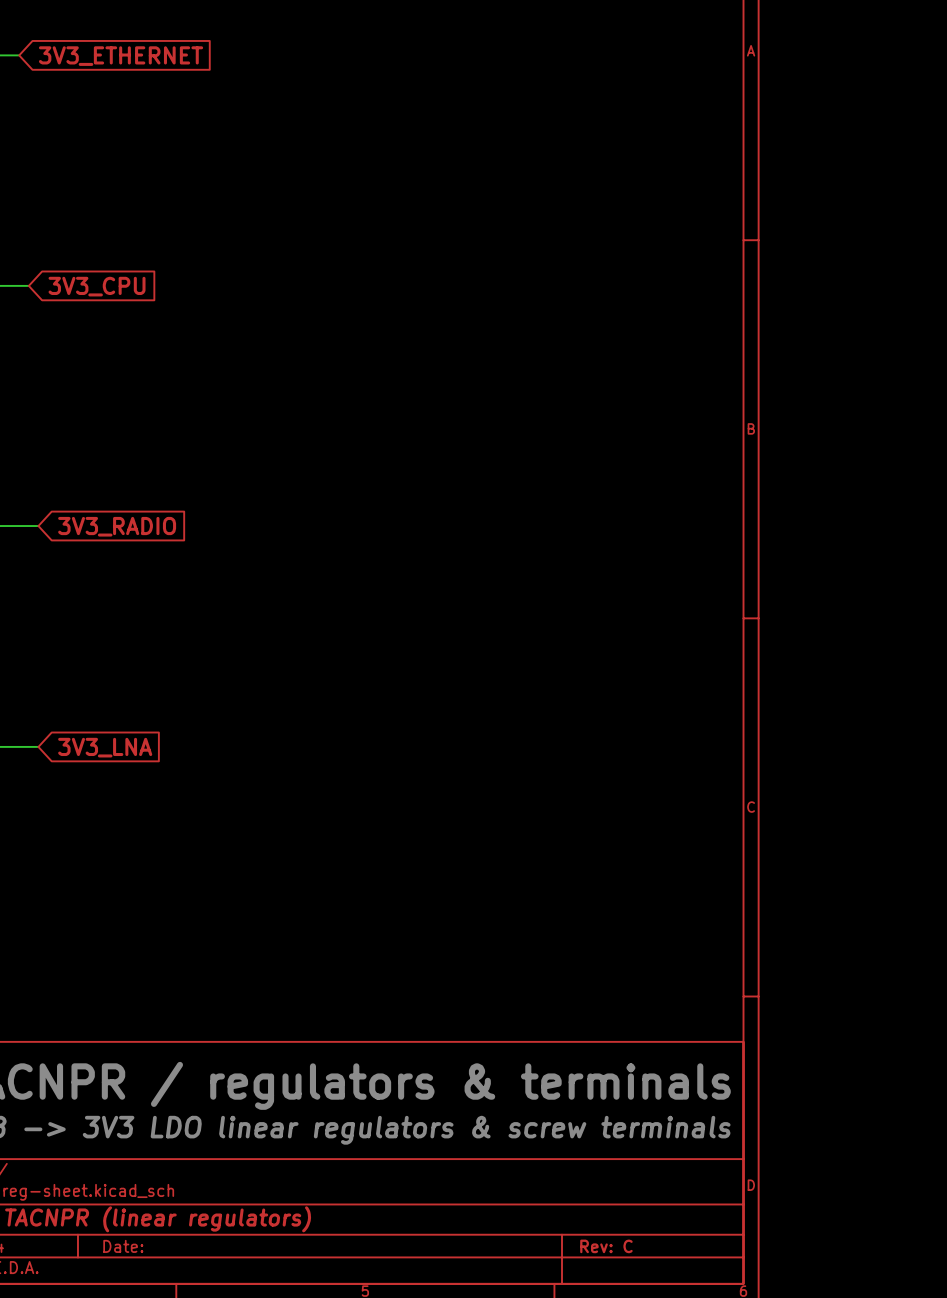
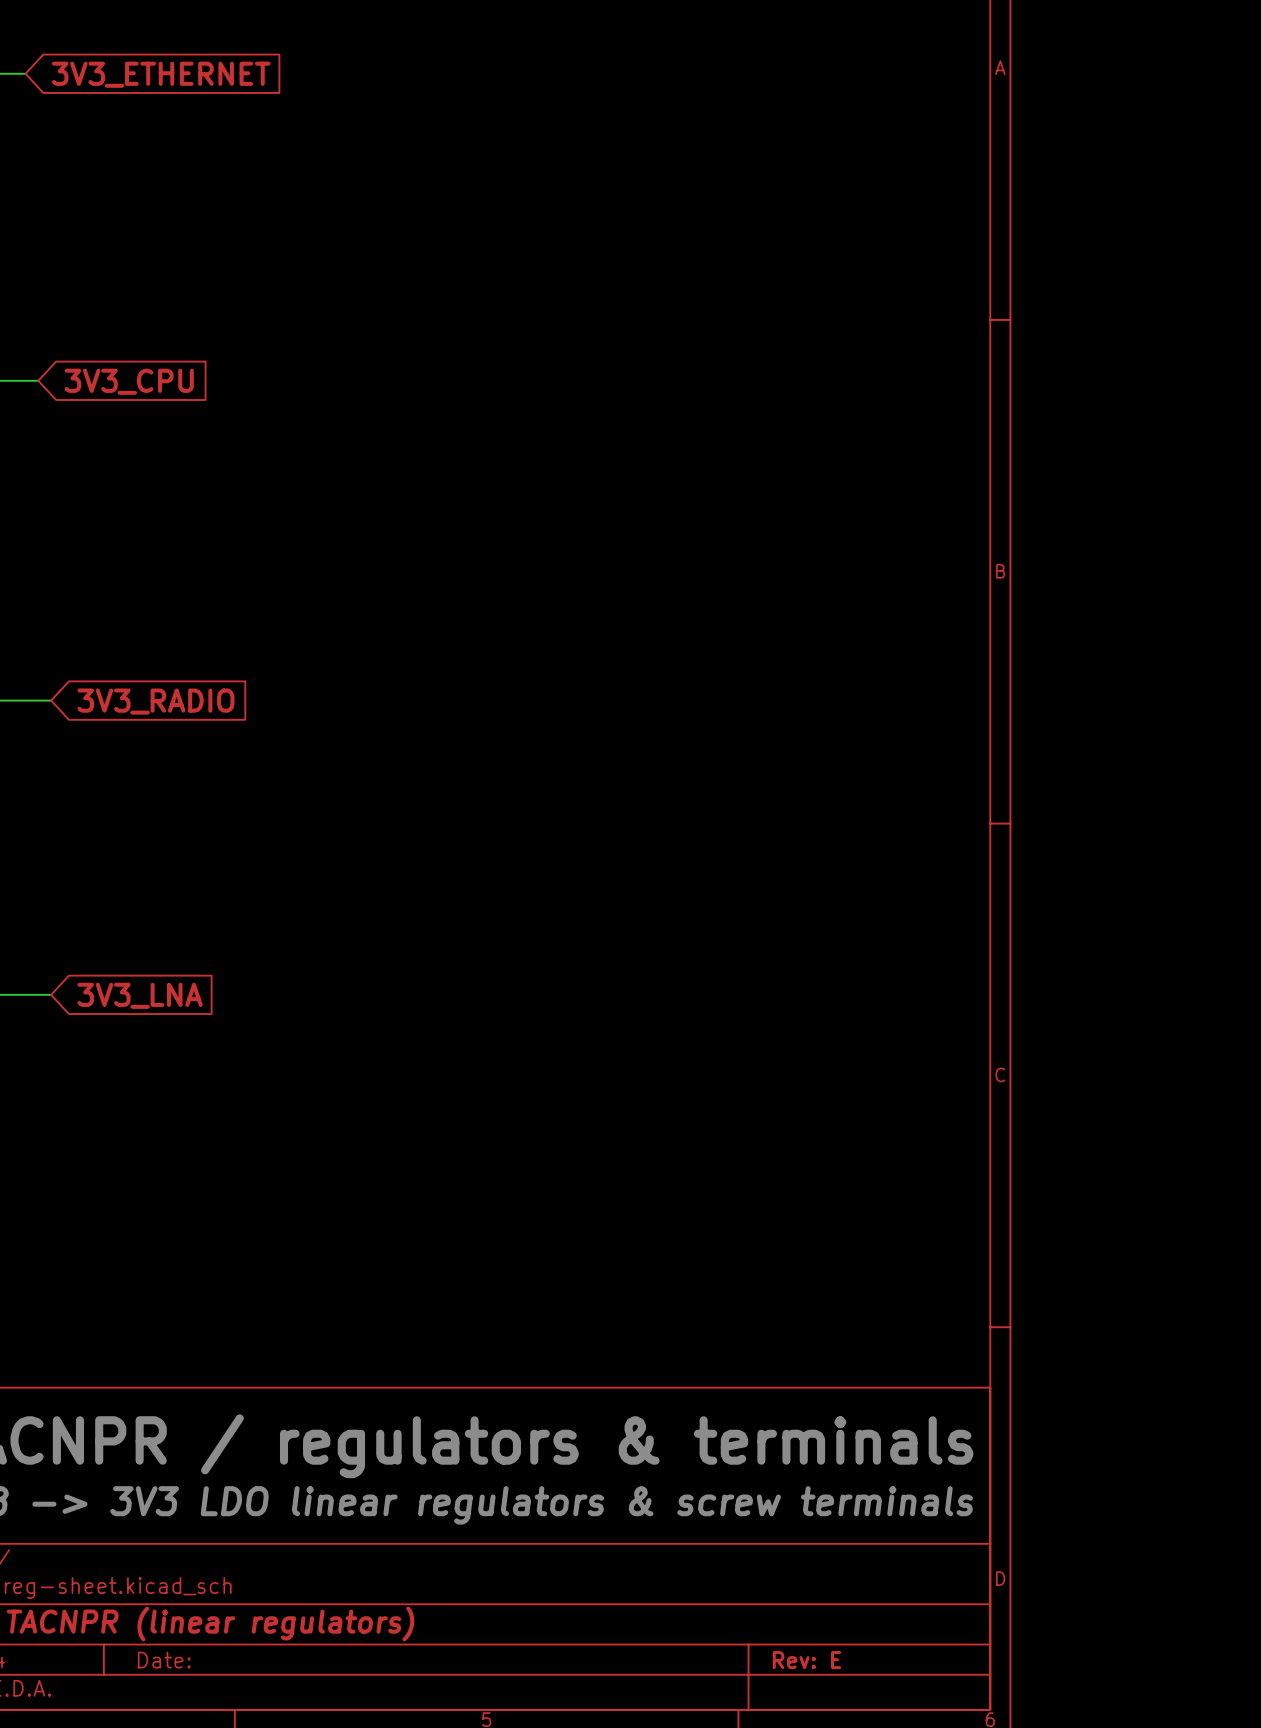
title block: Rev: C (606, 1246) -> Rev: E (806, 1660)

